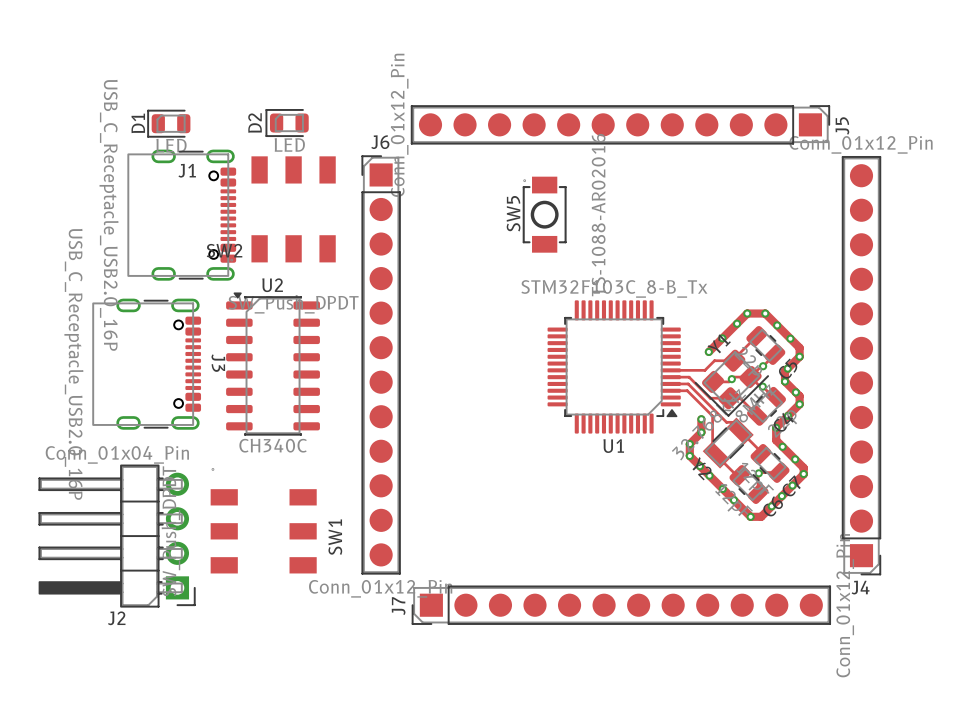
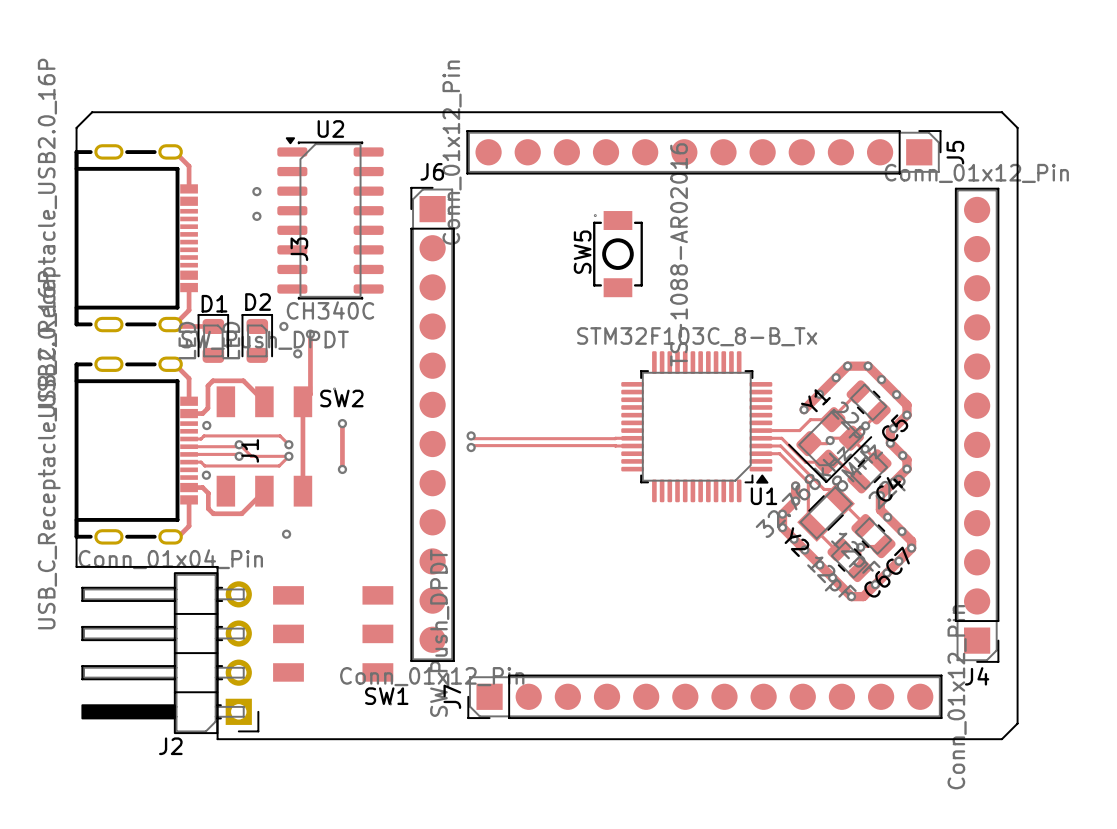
D1 rotation: 0° (168, 123) -> 90° clockwise (213, 338)
D1 position: (168, 123) -> (213, 338)
D2 rotation: 0° (287, 123) -> 90° clockwise (257, 338)
D2 position: (287, 123) -> (257, 338)
track: none -> (170, 151) (174, 151) (189, 166) (189, 188)
board edge: none -> (76, 166) (76, 127) (92, 112) (1001, 112) (1017, 127) (1017, 723) (1001, 739) (217, 739) (217, 566) (76, 566) (76, 519)
J1 footprint: [127, 149, 237, 281] -> [74, 356, 198, 545]
via: none -> (256, 191)
J1 name position: J1 (187, 170) -> J1 (250, 450)
via: none -> (256, 216)
SW2 rotation: 0° (283, 209) -> 180° (276, 446)
SW2 position: (283, 209) -> (276, 446)
track: none -> (189, 287) (189, 310) (174, 324) (170, 324) (172, 326) (213, 326) (208, 321)
via: none -> (283, 326)
track: none -> (310, 334) (310, 394) (302, 401) (302, 491)
via: none -> (310, 334)
J3 footprint: [92, 298, 202, 430] -> [74, 144, 198, 333]
via: none -> (297, 353)
track: none -> (170, 364) (174, 364) (189, 378) (189, 401)
track: none -> (264, 401) (243, 380) (212, 380) (207, 385) (207, 408) (202, 413) (189, 413)
J3 name position: J3 (218, 363) -> J3 (299, 249)
U2 position: (273, 363) -> (330, 218)
track: none -> (342, 423) (342, 469)
via: none -> (342, 423)
via: none -> (206, 425)
track: none -> (471, 435) (473, 438) (632, 438)
via: none -> (471, 435)
track: none -> (189, 439) (201, 439) (204, 435) (280, 435) (288, 444)
via: none -> (239, 444)
via: none -> (288, 444)
track: none -> (632, 446) (473, 445) (471, 447)
track: none -> (189, 446) (237, 446) (239, 444) (251, 456) (288, 456) (279, 465) (204, 465) (201, 462) (189, 462)
via: none -> (471, 447)
track: none -> (189, 454) (237, 454) (239, 456)
via: none -> (239, 456)
via: none -> (288, 456)
via: none -> (342, 469)
via: none -> (206, 475)
track: none -> (189, 487) (202, 487) (208, 493) (208, 508) (213, 513) (241, 513) (264, 491)
track: none -> (189, 499) (189, 526) (178, 536) (170, 536)
U1 name position: U1 (613, 446) -> U1 (764, 496)
via: none -> (286, 534)
SW1 rotation: 0° (263, 521) -> 180° (333, 645)
J2 position: (117, 536) -> (170, 653)
SW1 name position: SW1 (335, 537) -> SW1 (386, 696)

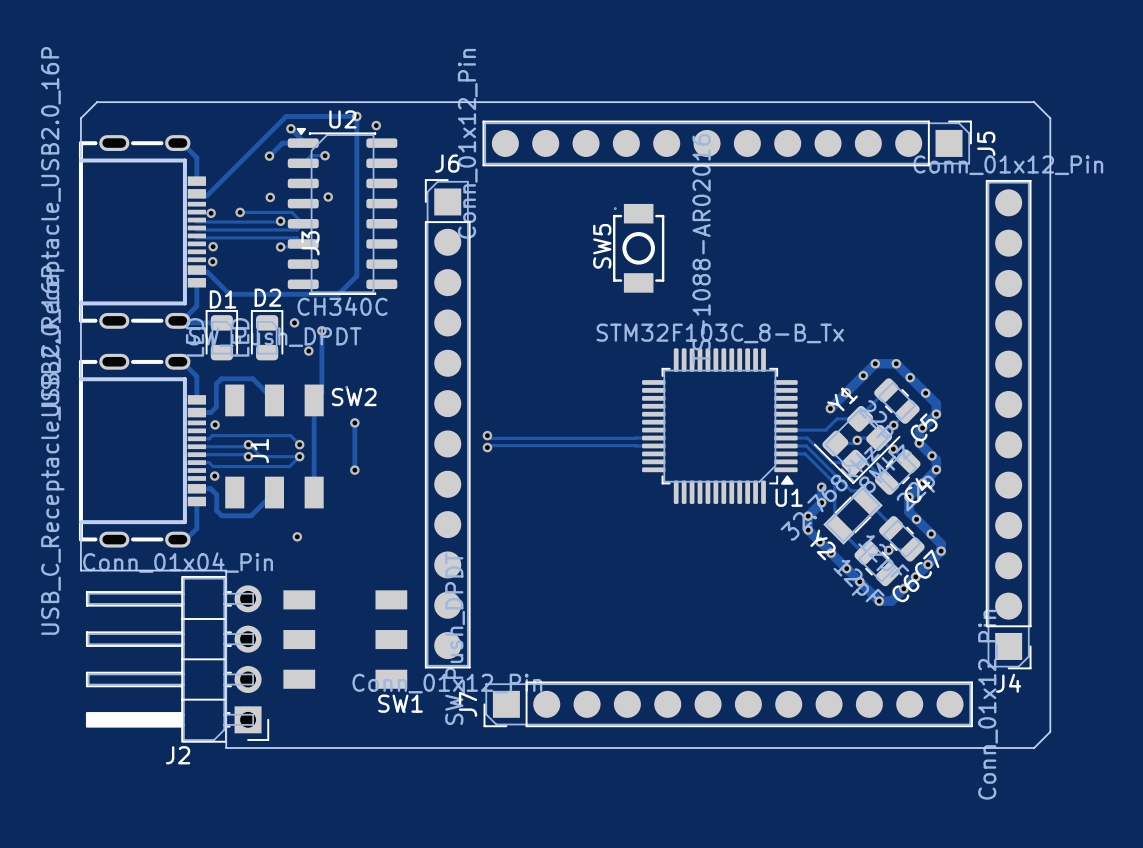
via: none -> (356, 116)
via: none -> (376, 125)
track: none -> (290, 128) (303, 143) (282, 143) (269, 156)
via: none -> (290, 128)
via: none -> (269, 156)
track: none -> (321, 155) (310, 155) (303, 163)
via: none -> (325, 155)
via: (256, 191) -> none
track: none -> (196, 195) (206, 195) (286, 116) (356, 116) (356, 276) (338, 294) (229, 294) (207, 272) (196, 272)
via: none -> (270, 197)
via: none -> (328, 197)
via: (256, 216) -> none
track: none -> (240, 212) (291, 212) (303, 223)
via: none -> (240, 212)
via: none -> (211, 213)
track: none -> (280, 221) (196, 222)
via: none -> (280, 221)
track: none -> (301, 225) (297, 229) (196, 229)
track: none -> (196, 237) (297, 237) (303, 243) (300, 247) (280, 247)
via: none -> (213, 246)
via: none -> (280, 247)
via: none -> (212, 261)
board edge: none -> (80, 300) (80, 379)

